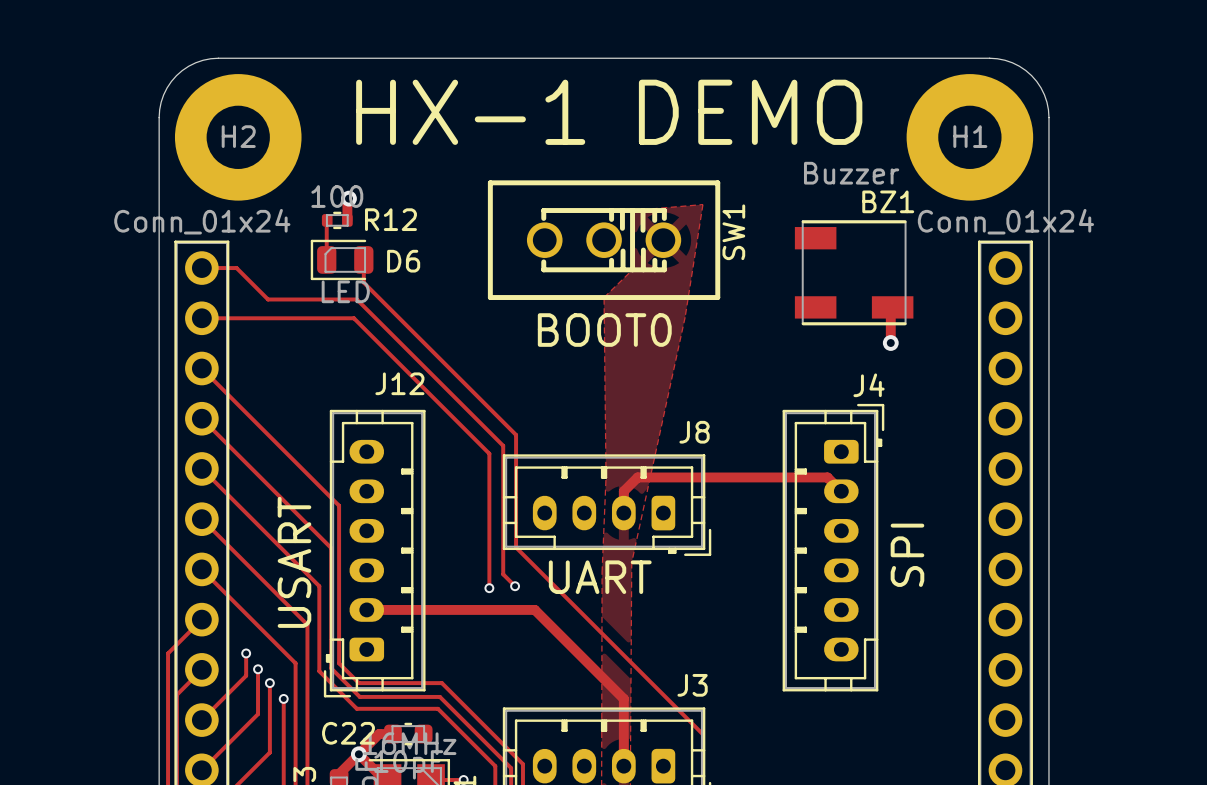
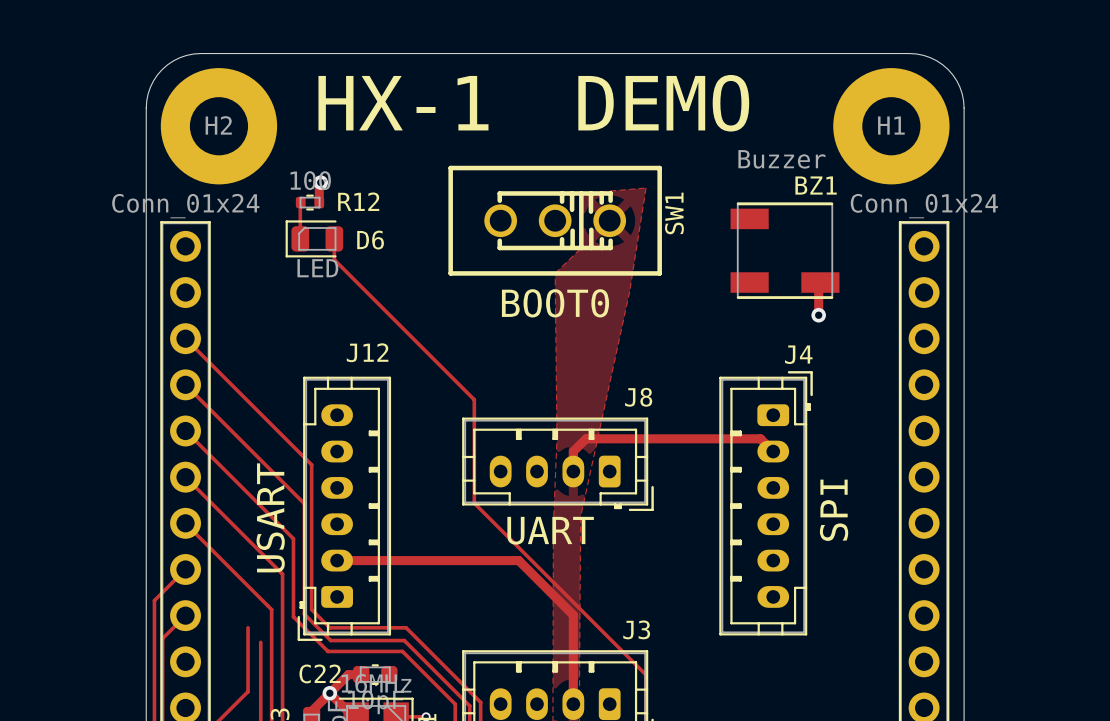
track: (201, 268) (236, 268) (268, 299) (356, 299) (503, 445) (503, 574) (515, 586) -> none
track: (201, 318) (353, 318) (489, 453) (489, 588) -> none
via: (515, 586) -> none
via: (489, 588) -> none
track: (534, 609) (623, 698) -> (491, 560) (518, 560) (573, 615) (573, 642)
track: (246, 653) (246, 675) (201, 720) -> none
via: (246, 653) -> none
track: (258, 669) (258, 714) (201, 770) -> none
via: (258, 669) -> none
via: (269, 683) -> none
via: (283, 698) -> none

